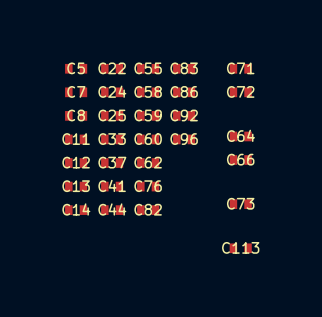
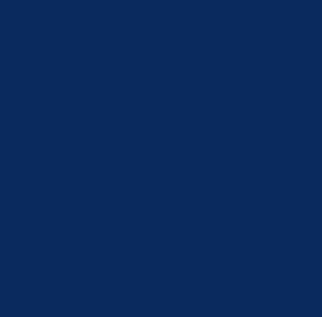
C5: (76, 68) -> none
C22: (112, 68) -> none
C55: (148, 68) -> none
C83: (184, 68) -> none
C71: (240, 68) -> none
C7: (76, 92) -> none
C24: (112, 92) -> none
C58: (148, 92) -> none
C86: (184, 92) -> none
C72: (240, 92) -> none
C8: (76, 115) -> none
C25: (112, 115) -> none
C59: (148, 115) -> none
C92: (184, 115) -> none
C64: (240, 136) -> none
C11: (76, 139) -> none
C33: (112, 139) -> none
C60: (148, 139) -> none
C96: (184, 139) -> none
C66: (240, 160) -> none
C12: (76, 163) -> none
C37: (112, 163) -> none
C62: (148, 163) -> none
C13: (76, 186) -> none
C41: (112, 186) -> none
C76: (148, 186) -> none
C73: (240, 204) -> none
C14: (76, 210) -> none
C44: (112, 210) -> none
C82: (148, 210) -> none
C113: (240, 248) -> none

